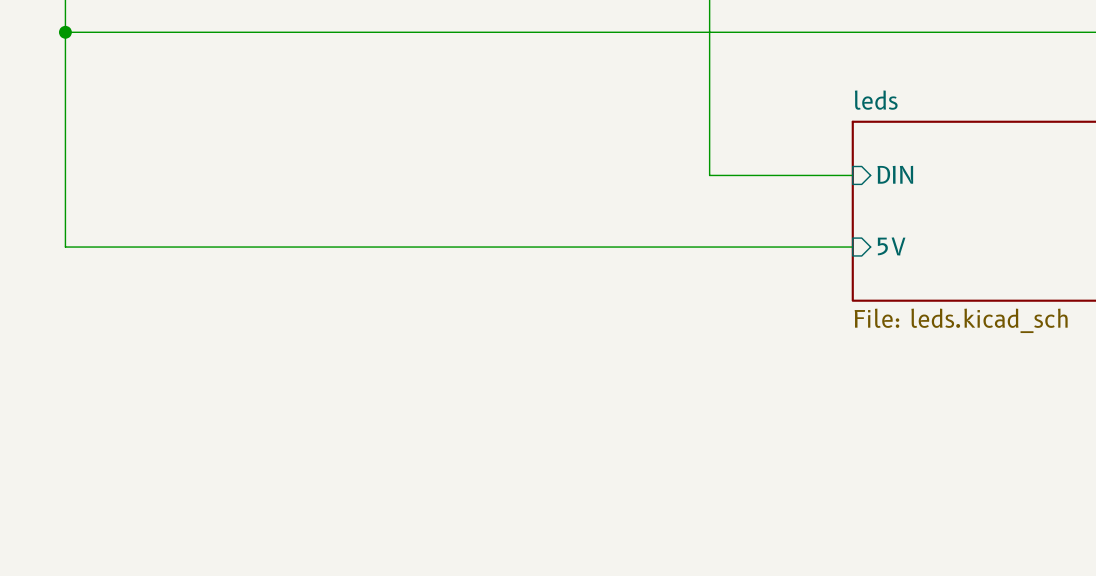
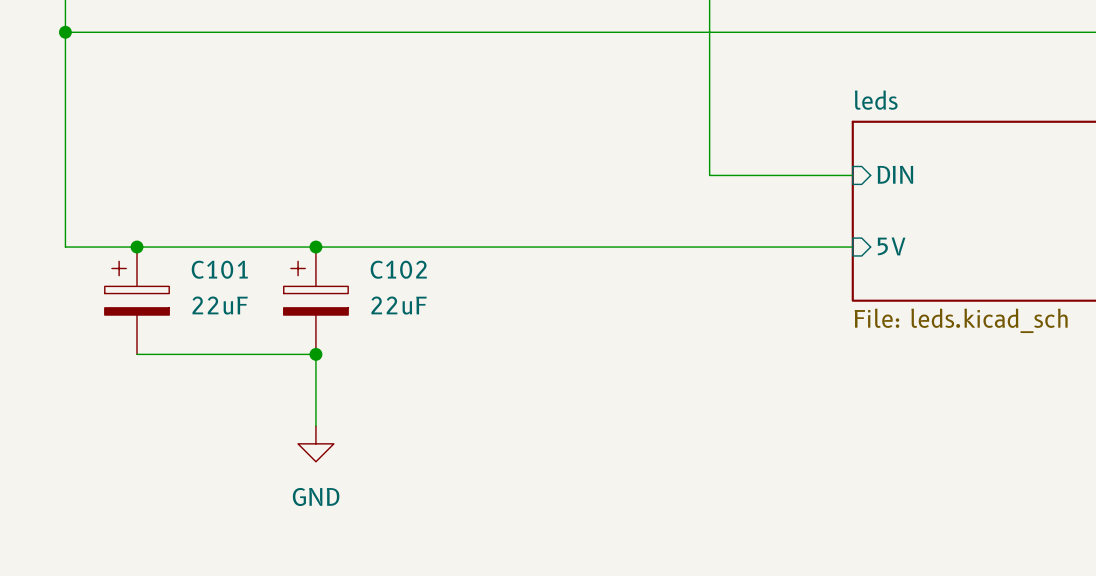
junction: none -> (137, 247)
junction: none -> (315, 247)
C101: none -> 22uF (137, 300)
C102: none -> 22uF (315, 300)
wire: none -> (137, 354) (315, 354) (315, 425)
junction: none -> (315, 354)
power symbol: none -> GND (315, 443)

